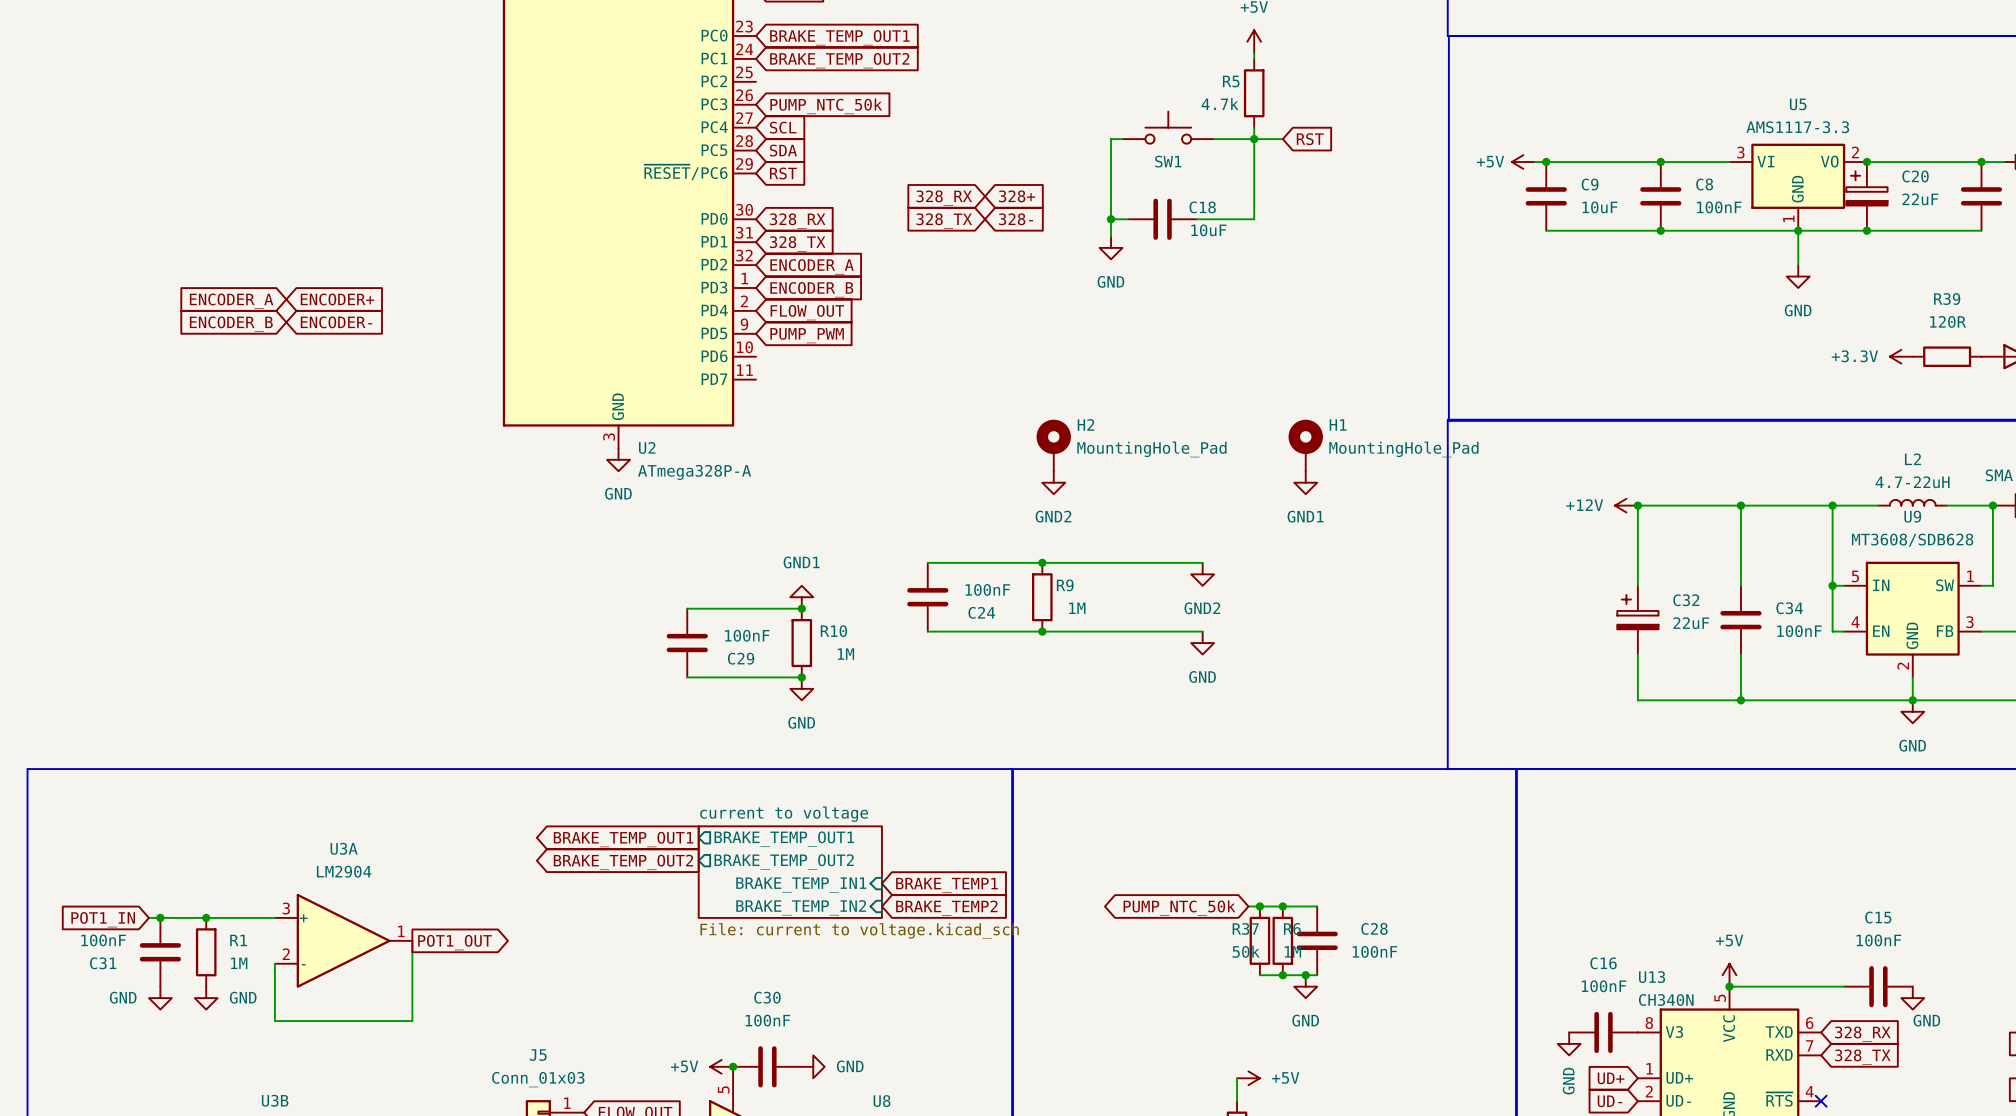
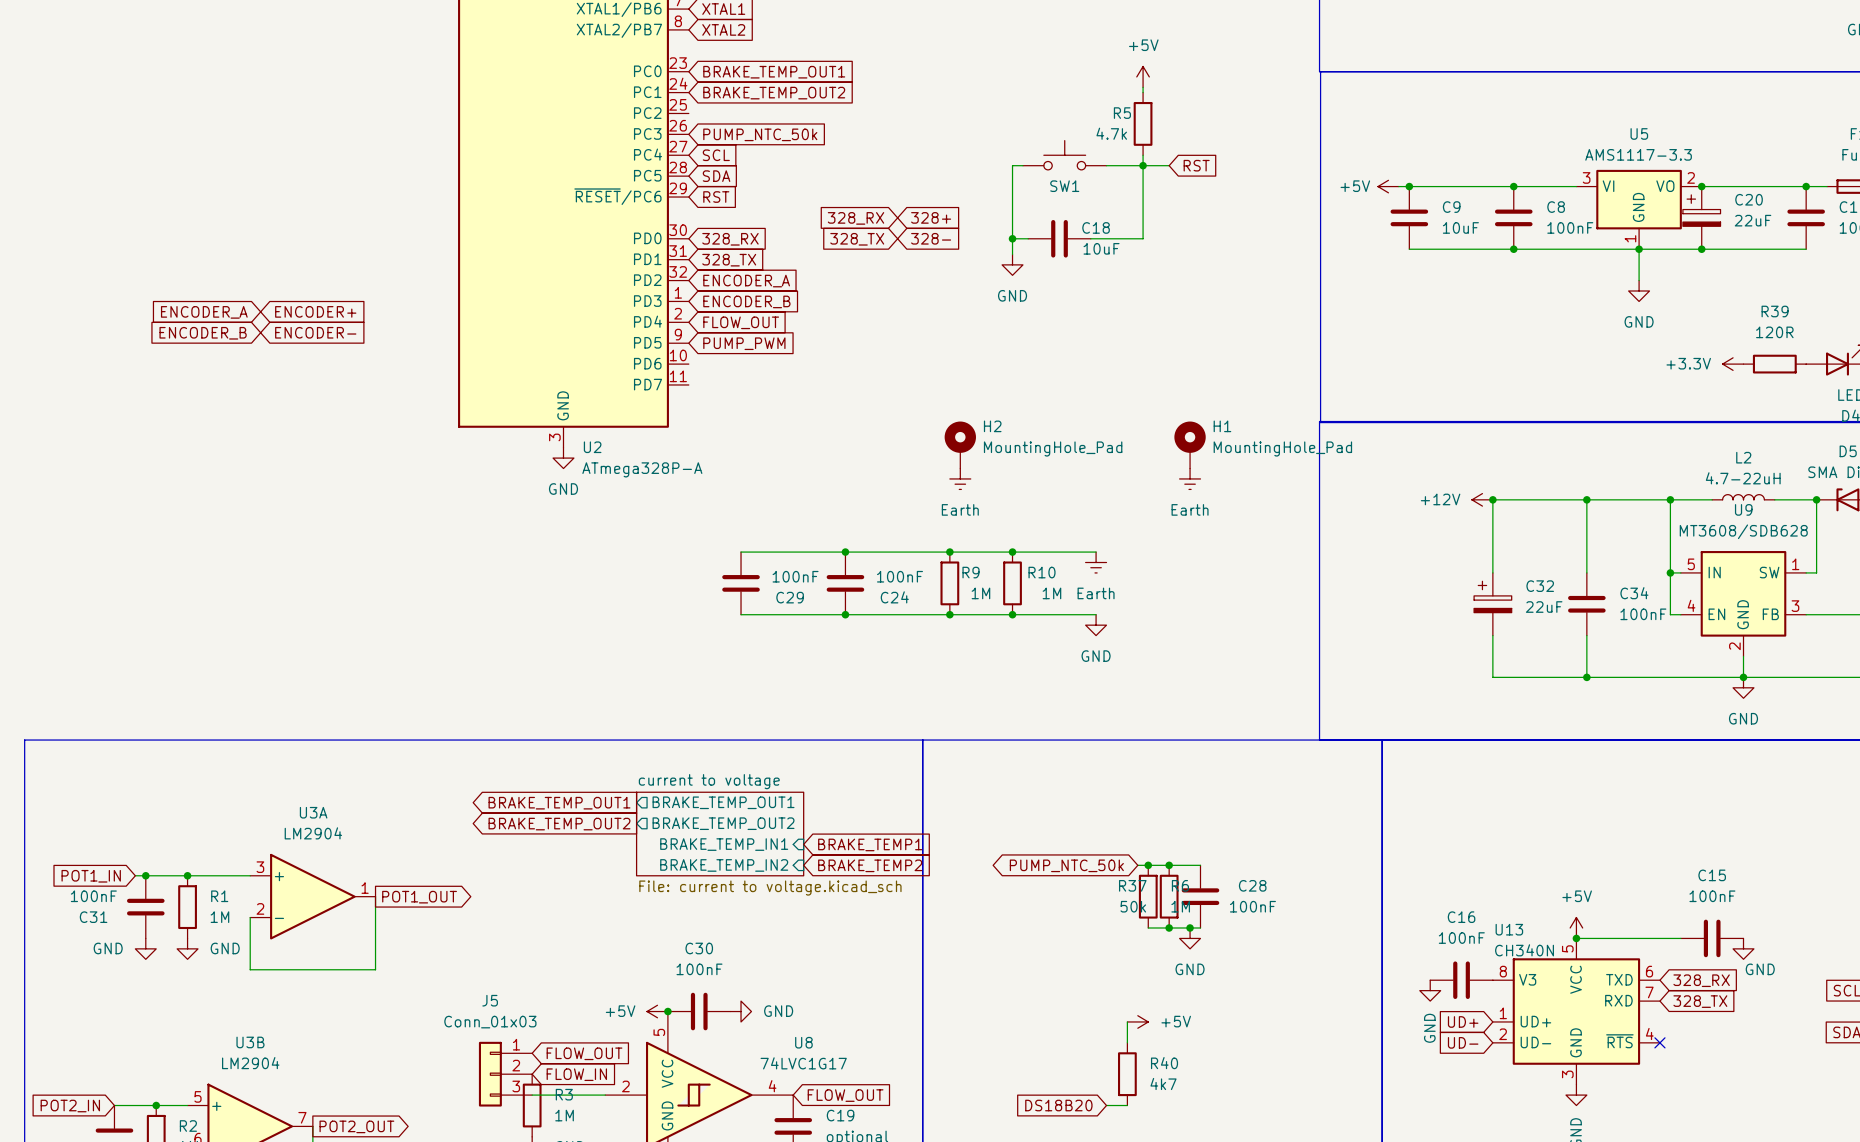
power symbol: GND2 (1053, 482) -> Earth (960, 478)
power symbol: GND1 (1305, 482) -> Earth (1190, 478)
junction: none -> (845, 552)
junction: none -> (1012, 552)
power symbol: GND2 (1202, 574) -> Earth (1096, 562)
power symbol: GND1 (801, 597) -> none
wire: (687, 608) (801, 608) -> (741, 552) (845, 552)
junction: (801, 608) -> none
junction: none -> (845, 614)
junction: none -> (1012, 614)
C29 position: (687, 643) -> (741, 583)
R10 position: (801, 643) -> (1012, 583)
wire: (687, 677) (801, 677) -> (741, 614) (845, 614)
junction: (801, 677) -> none
power symbol: GND (801, 688) -> none

